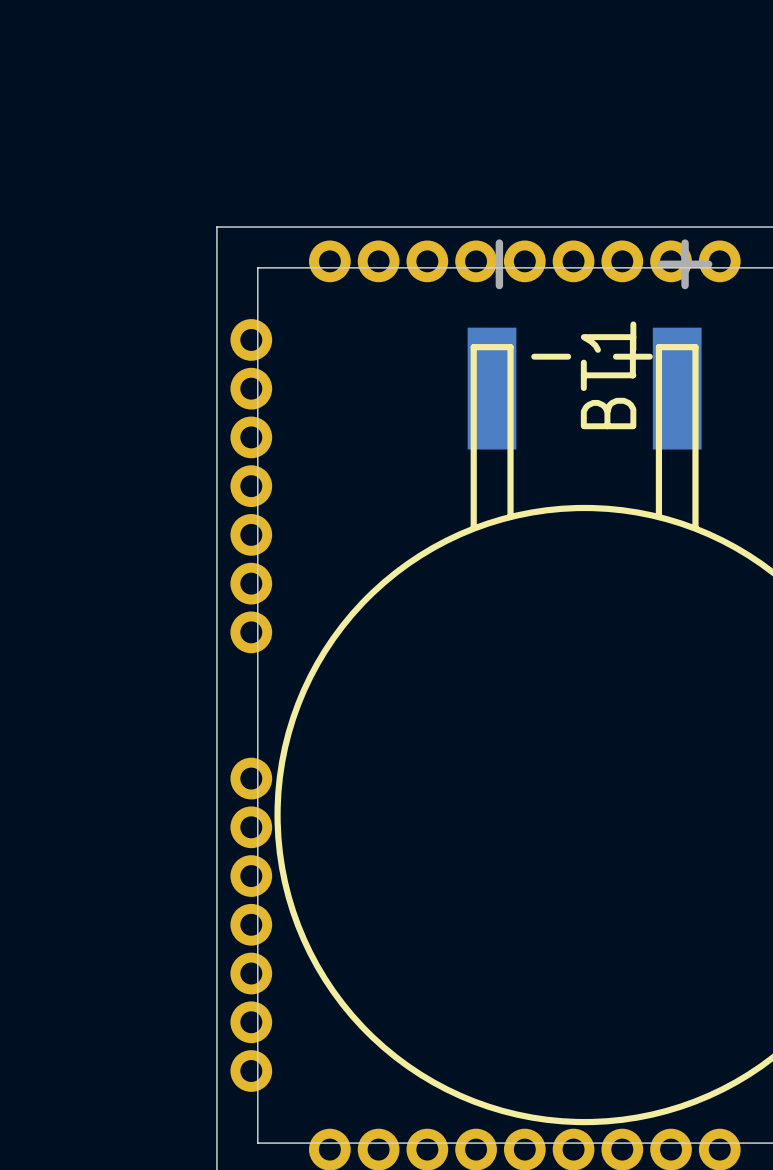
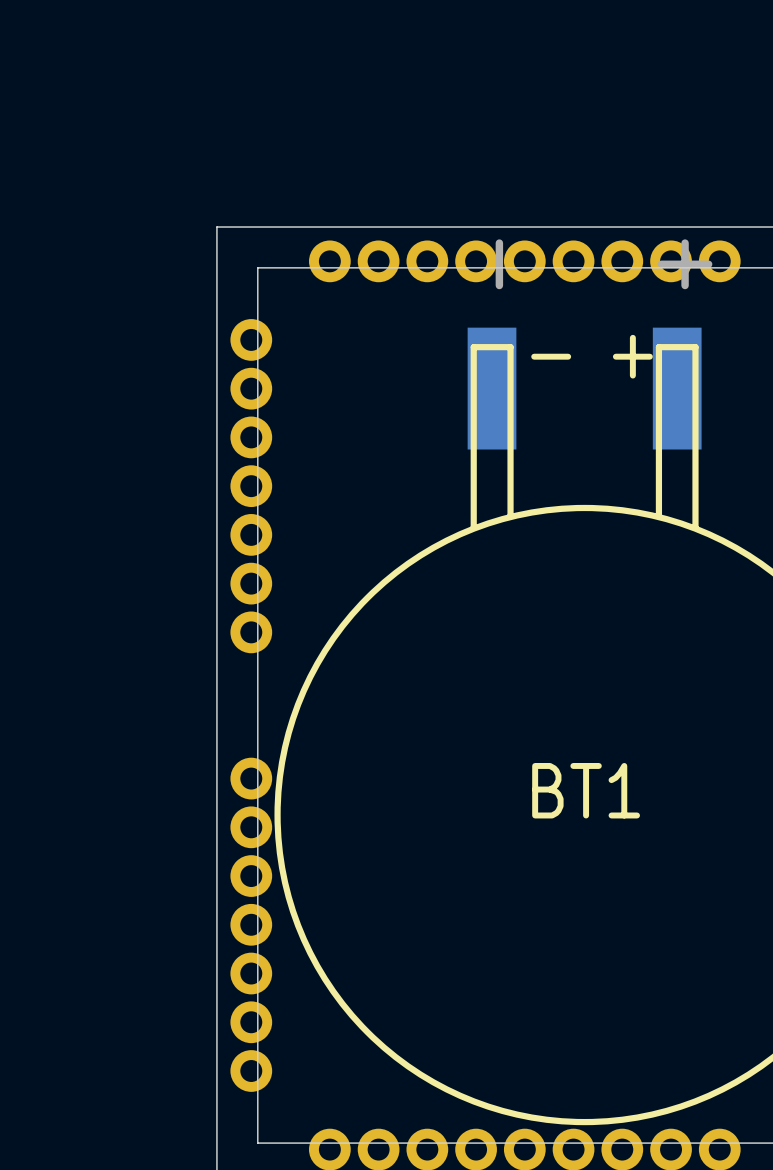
BT1 name rotation: 0° (608, 375) -> 90° clockwise (586, 790)
BT1 name position: BT1 (608, 375) -> BT1 (586, 790)

